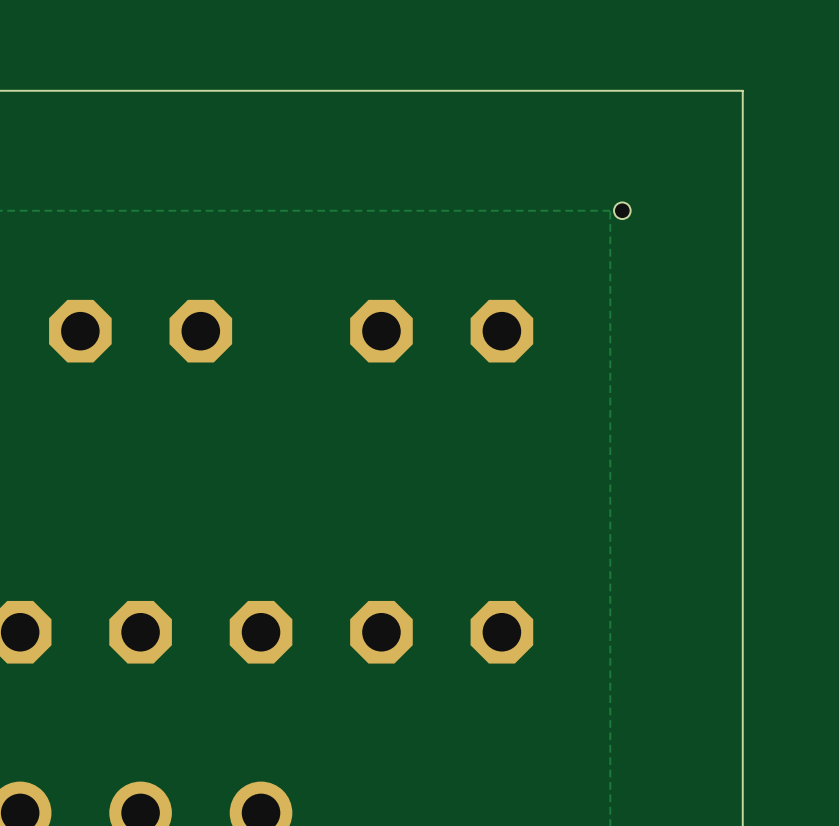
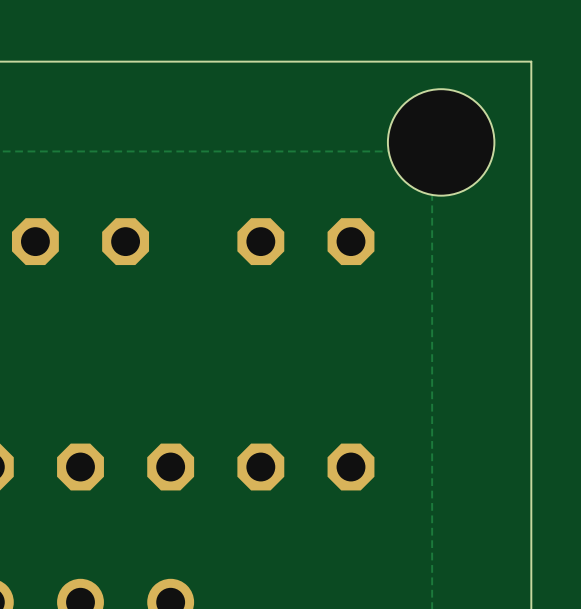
hole size: [614, 202, 631, 220] -> [387, 89, 495, 196]

